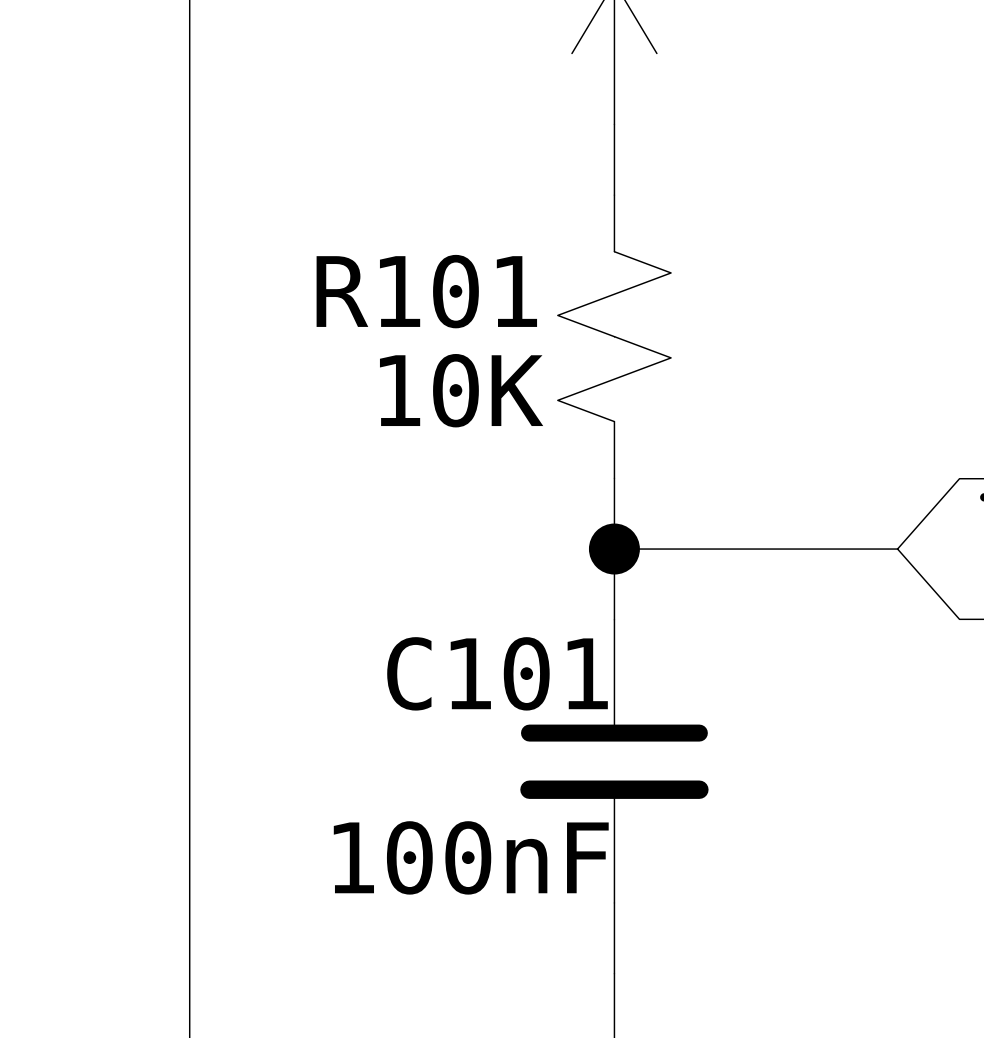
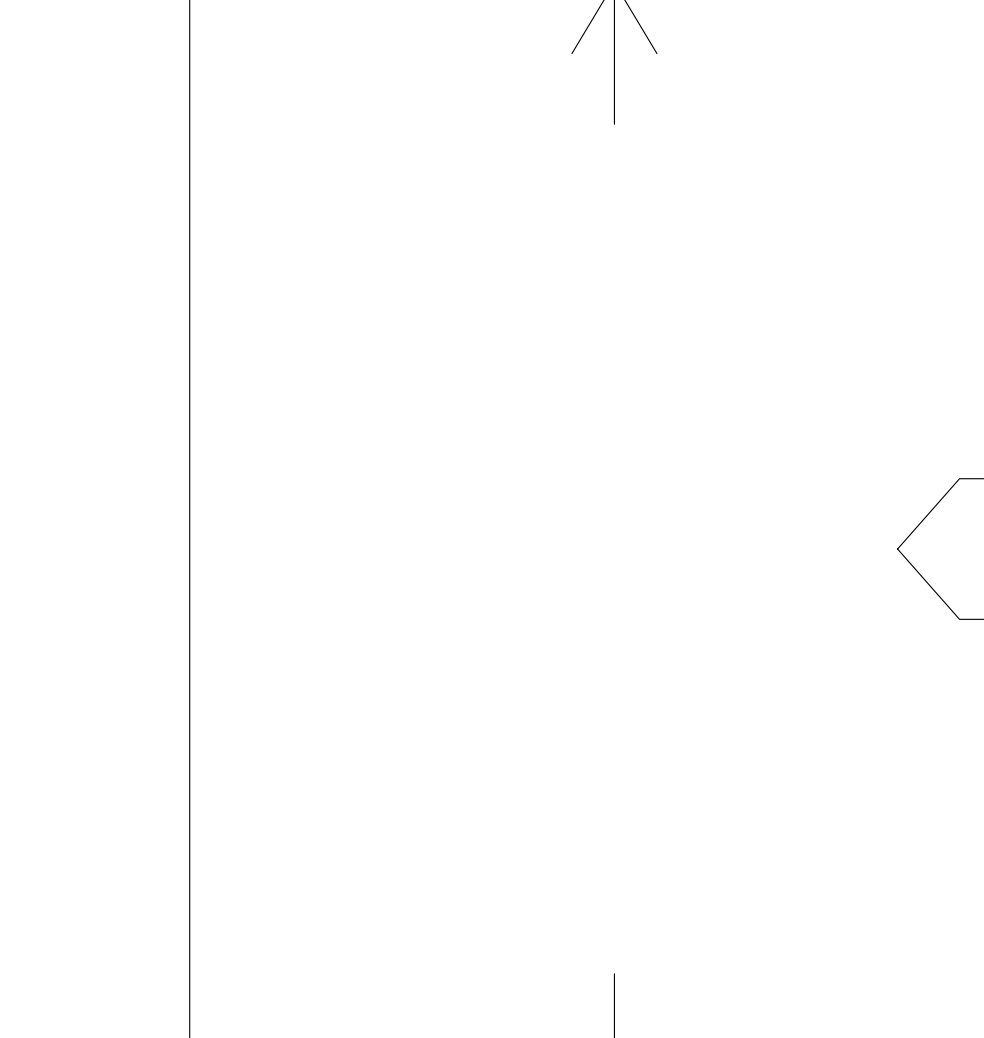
wire: (614, 124) (614, 195) -> none
R101: 10K (614, 336) -> none
wire: (614, 478) (614, 619) -> none
wire: (614, 549) (897, 549) -> none
junction: (614, 549) -> none
C101: 100nF (614, 761) -> none
wire: (614, 902) (614, 973) -> none

